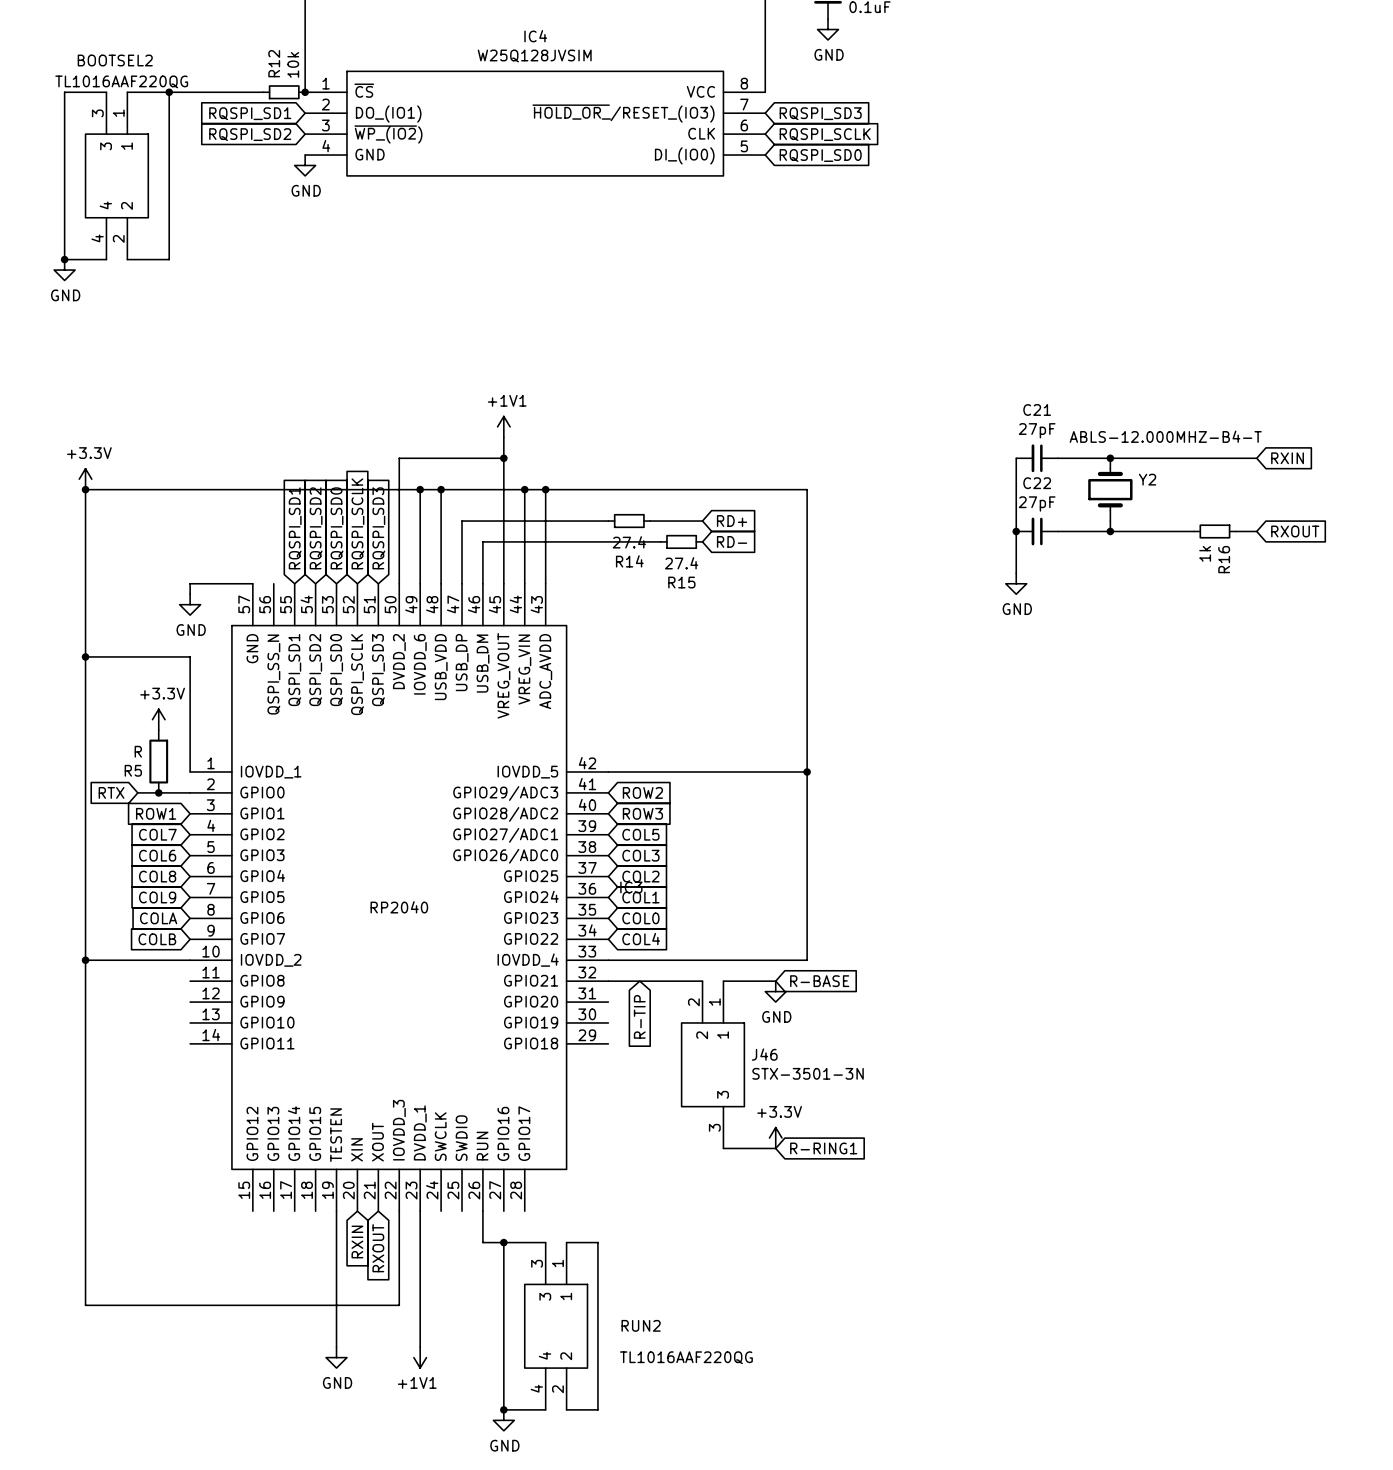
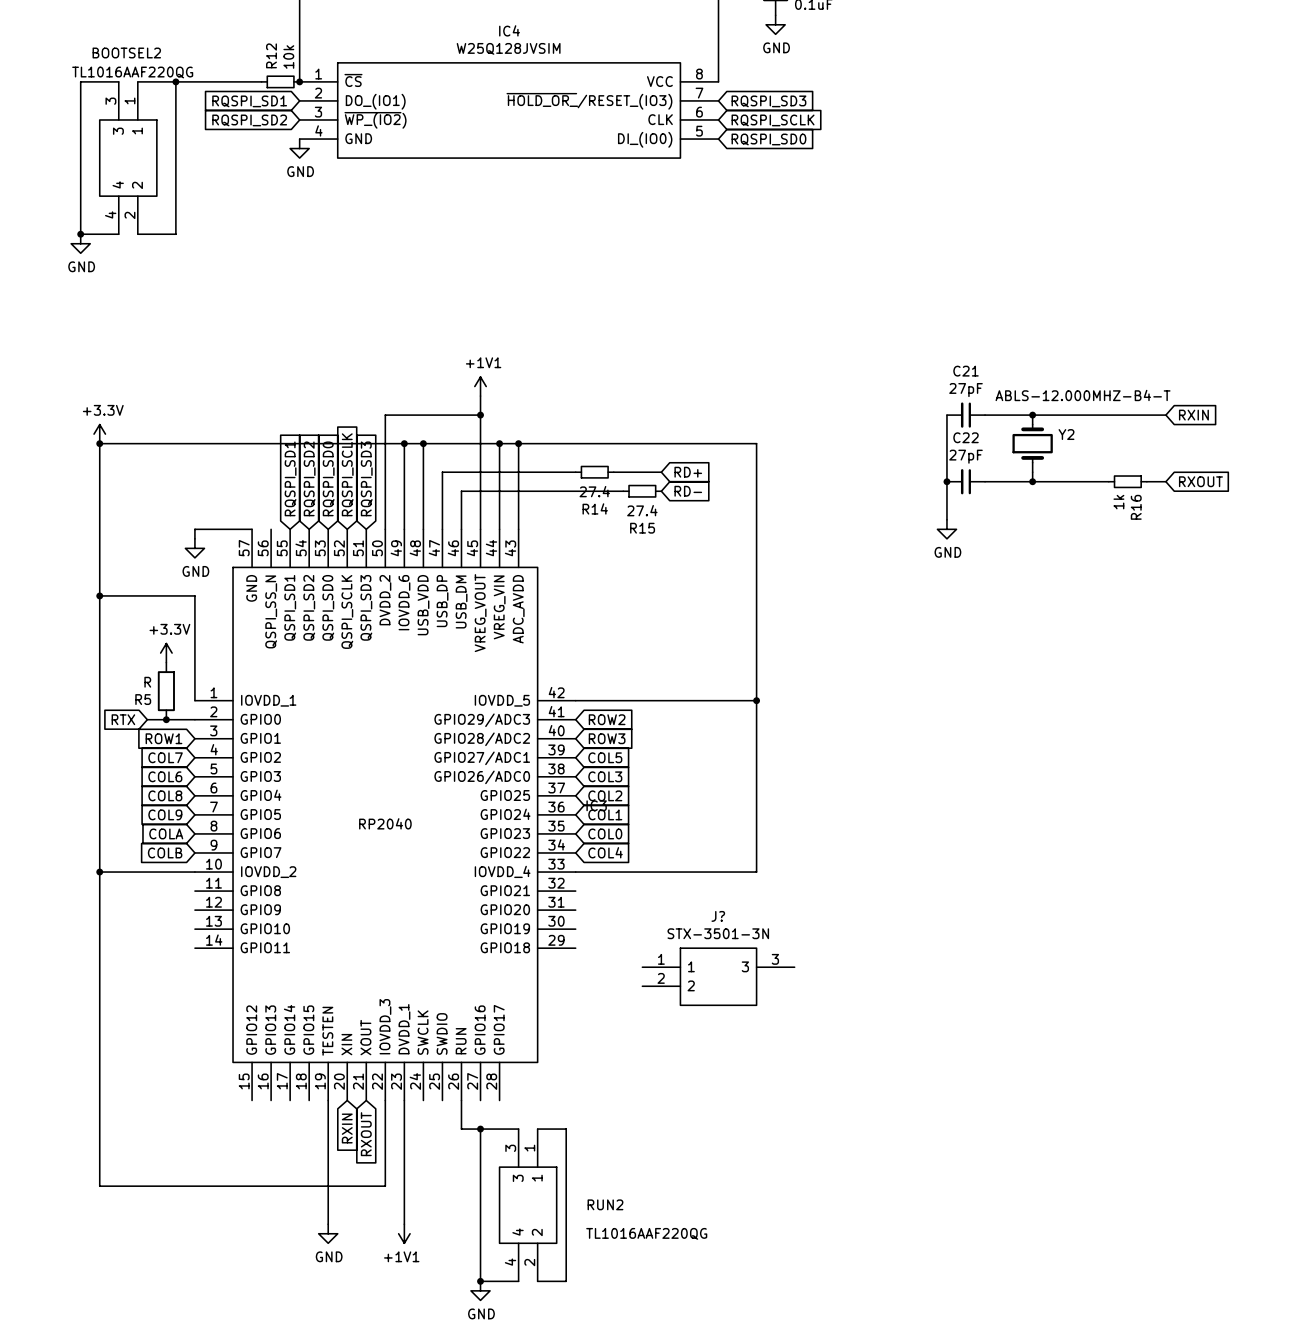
wire: (608, 981) (702, 981) -> none
wire: (723, 981) (775, 981) -> none
global label: R-BASE (819, 981) -> none
power symbol: GND (775, 991) -> none
global label: R-TIP (639, 1016) -> none
J46: STX-3501-3N (712, 1064) -> none
J?: none -> STX-3501-3N (718, 976)
power symbol: +3.3V (775, 1138) -> none
wire: (723, 1148) (775, 1148) -> none
global label: R-RING1 (823, 1148) -> none

